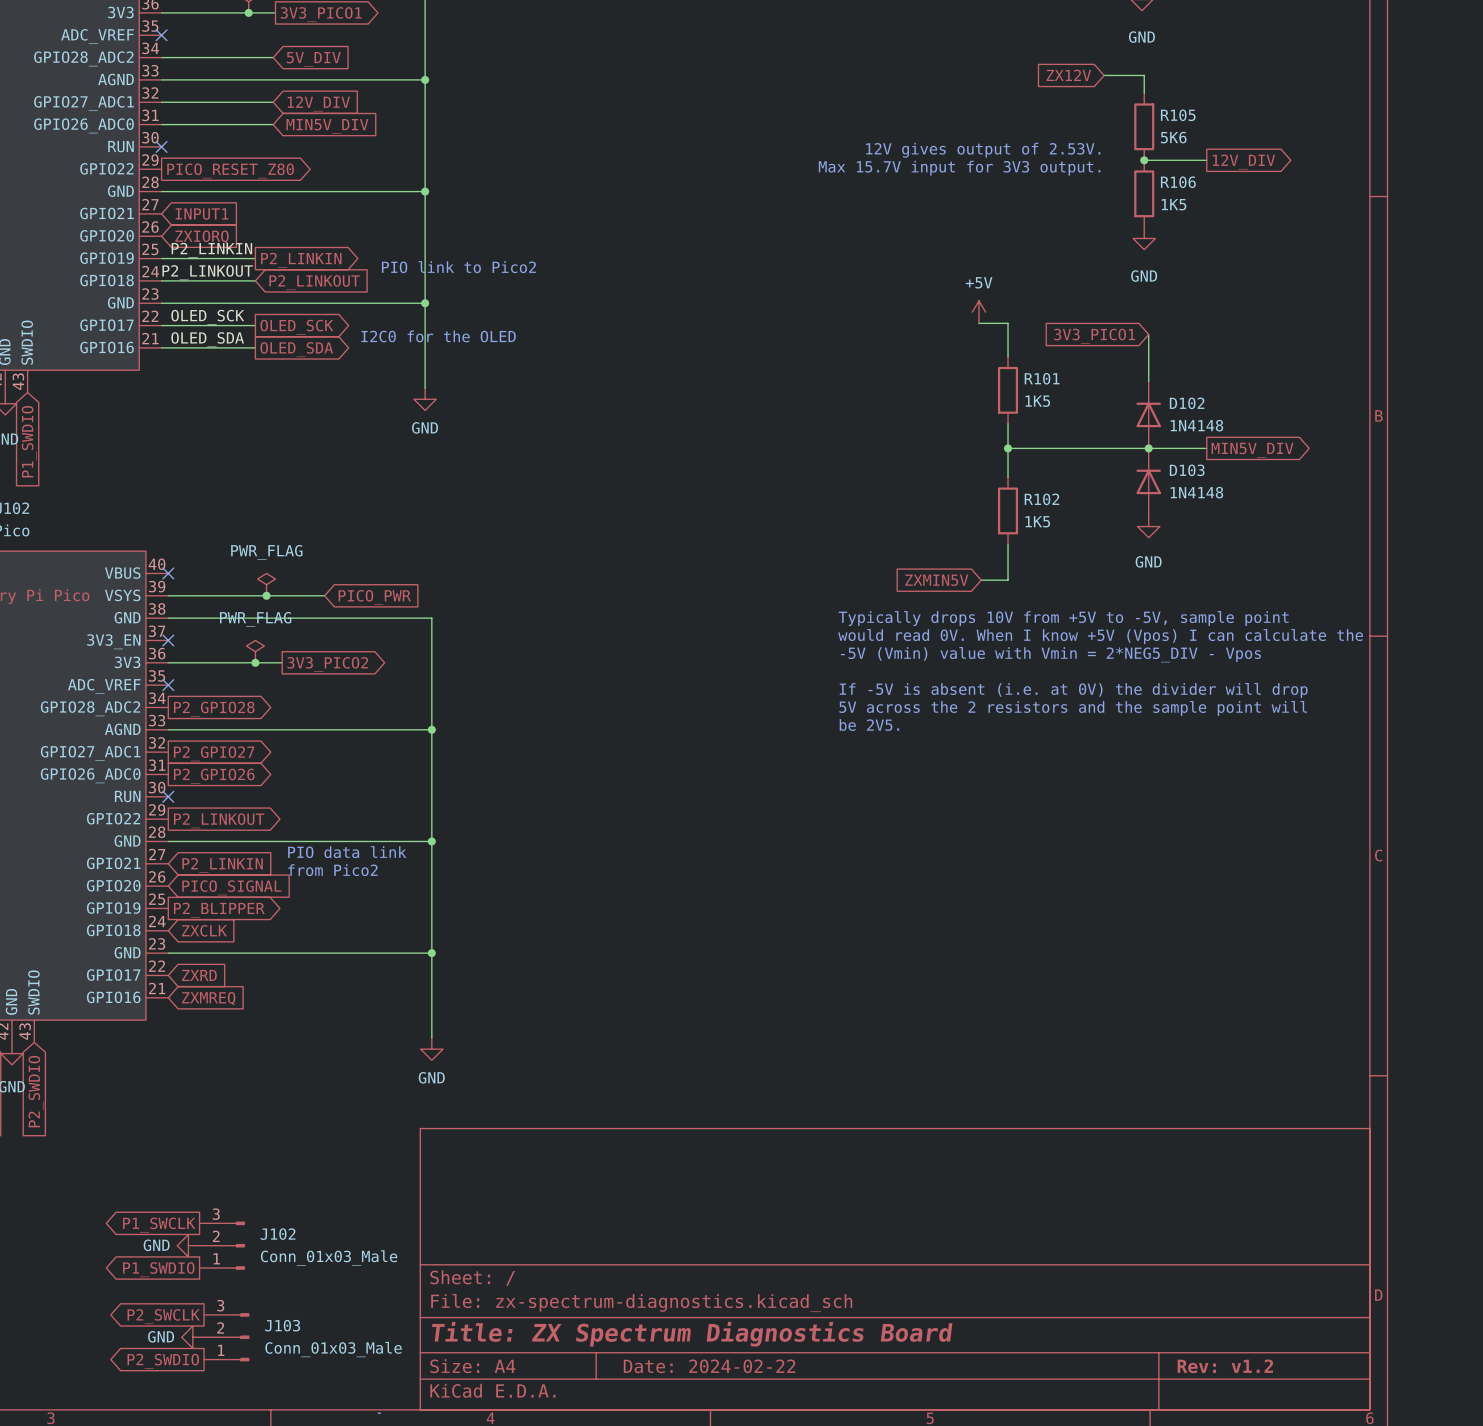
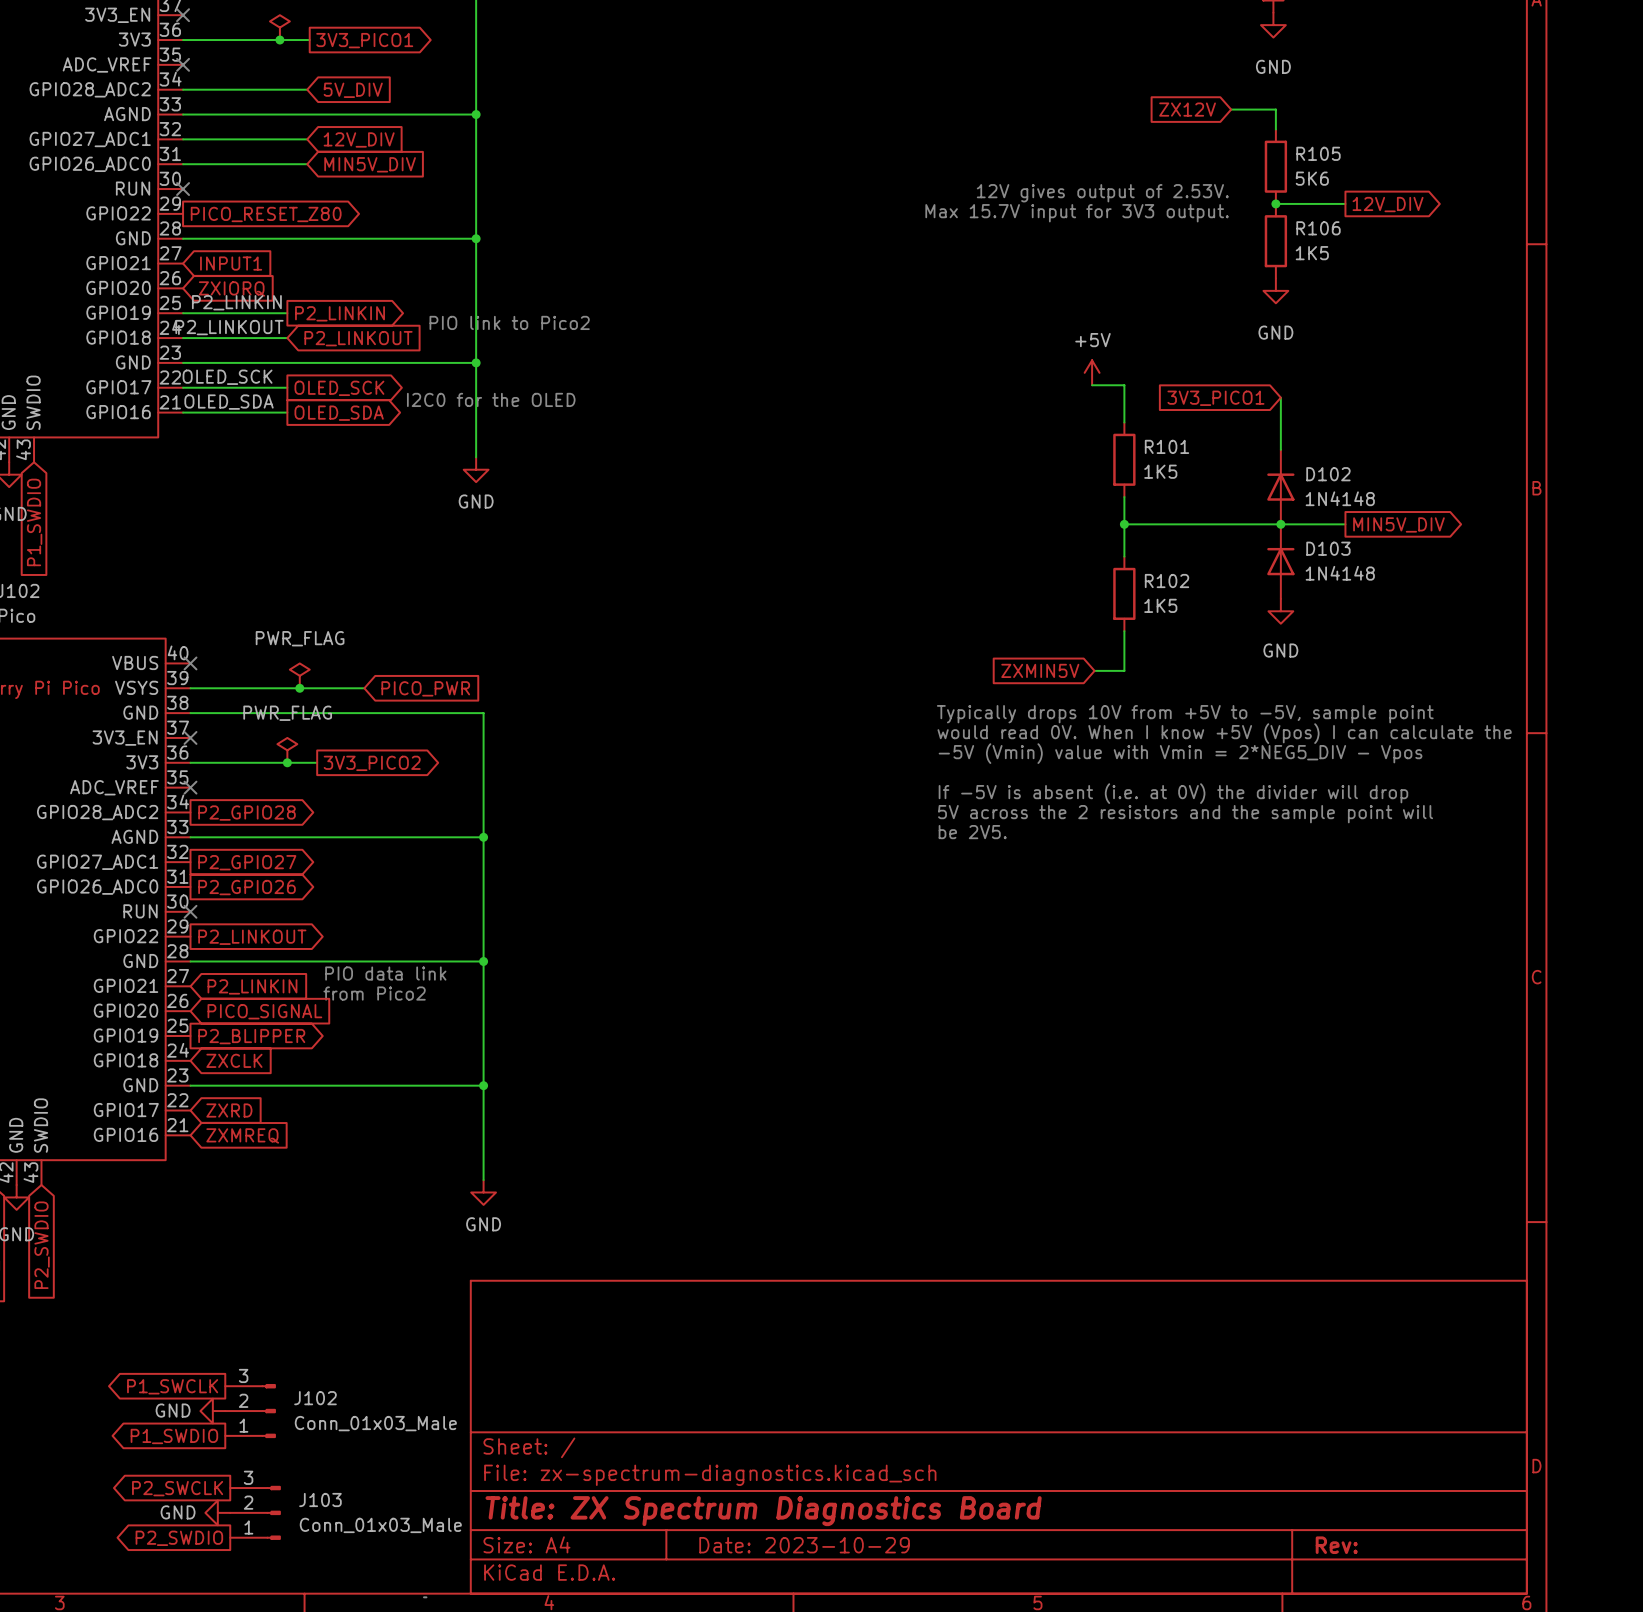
title block: Date: 2024-02-22 (709, 1366) -> Date: 2023-10-29 (804, 1545)
title block: Rev: v1.2 (1225, 1366) -> Rev: (1336, 1545)

